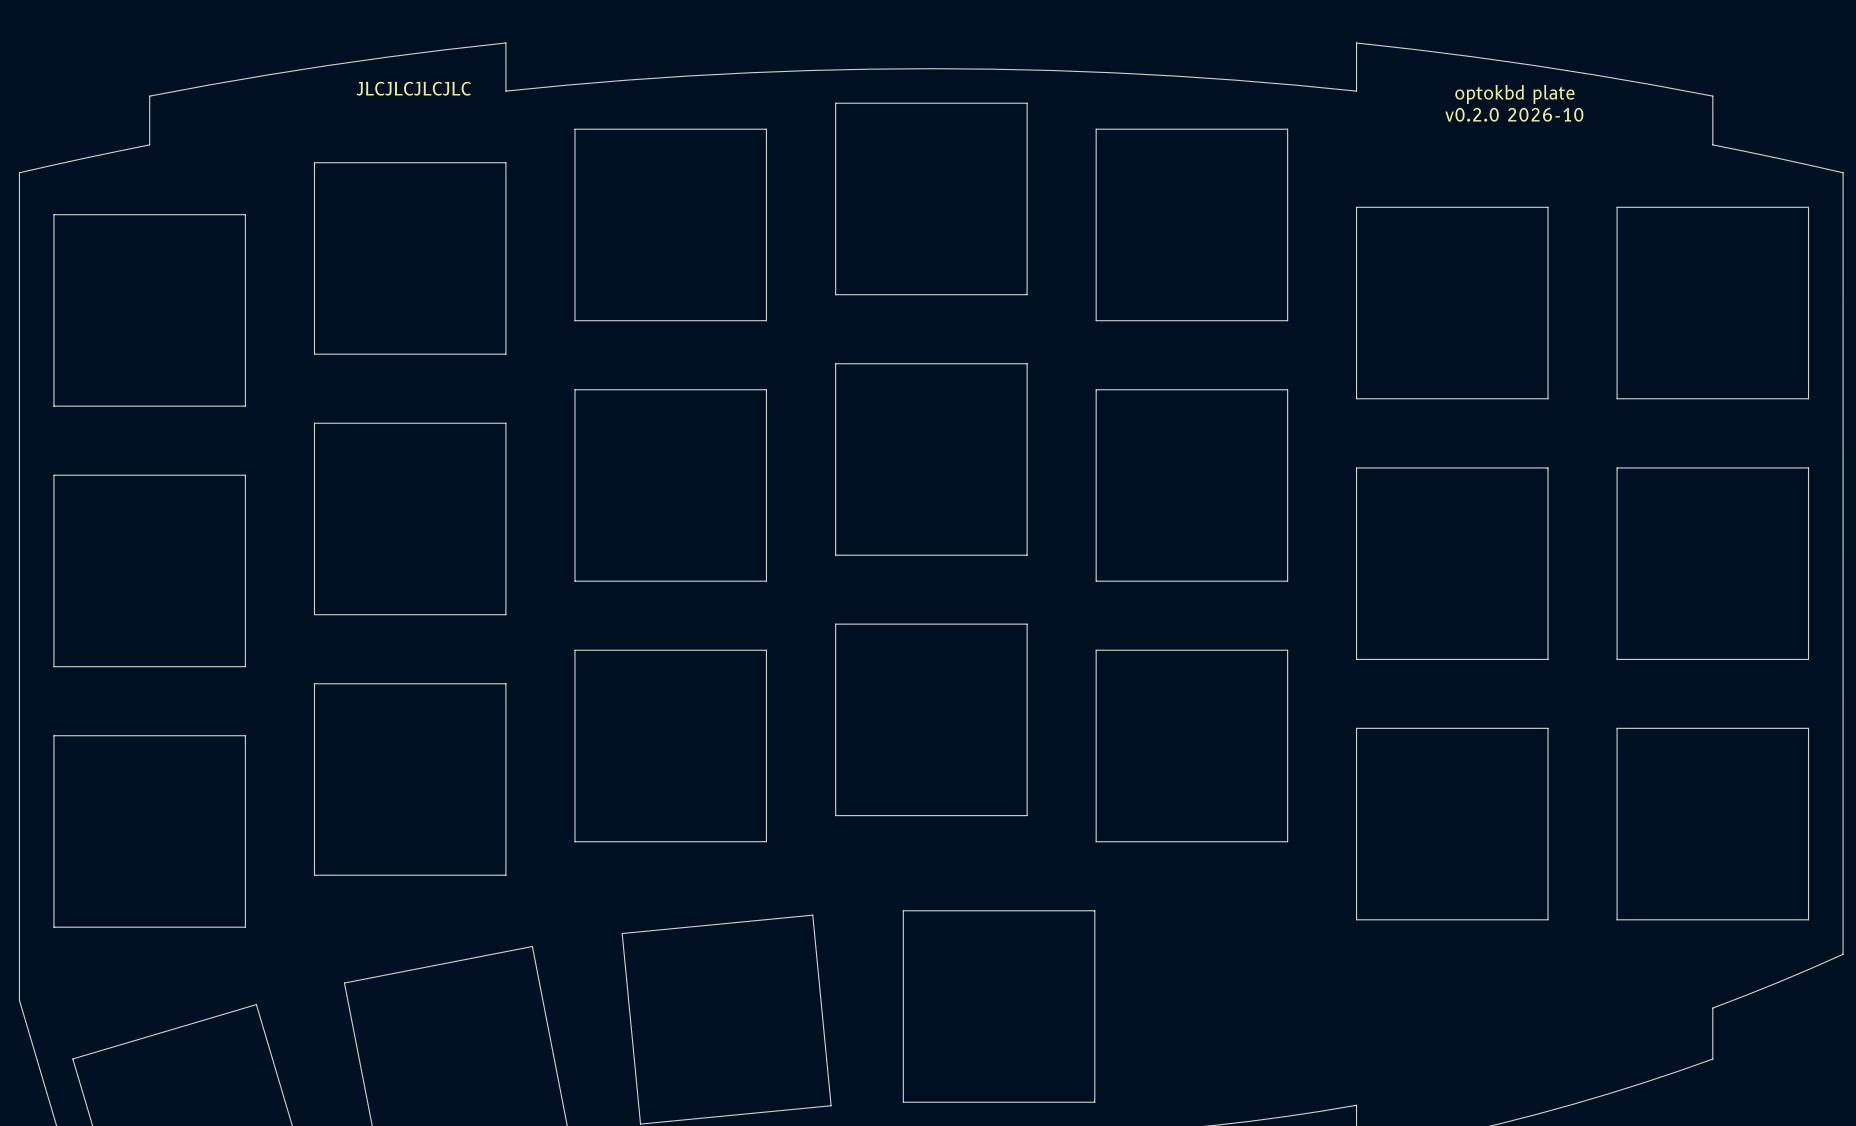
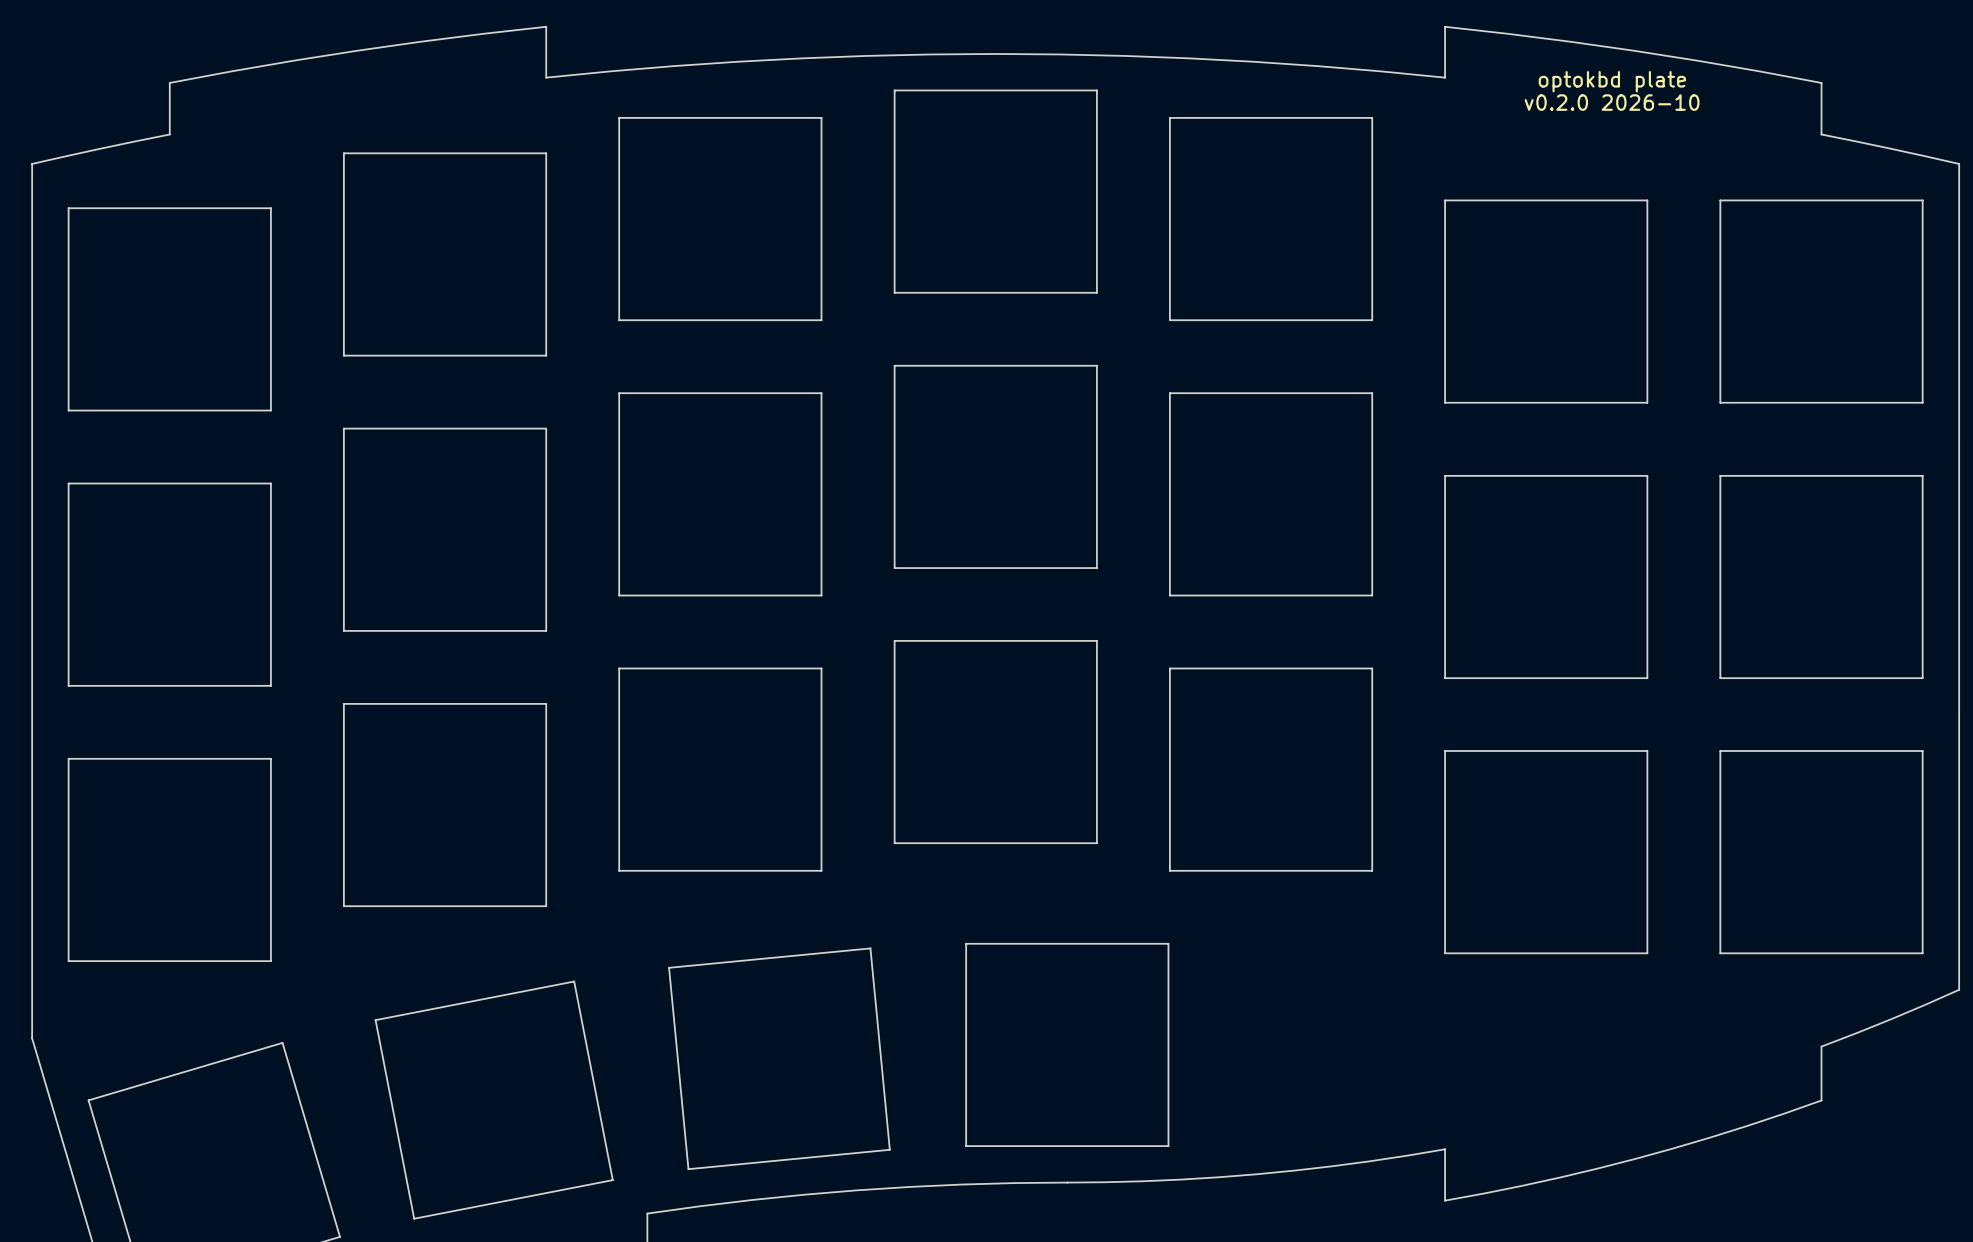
text: JLCJLCJLCJLC (413, 88) -> none

